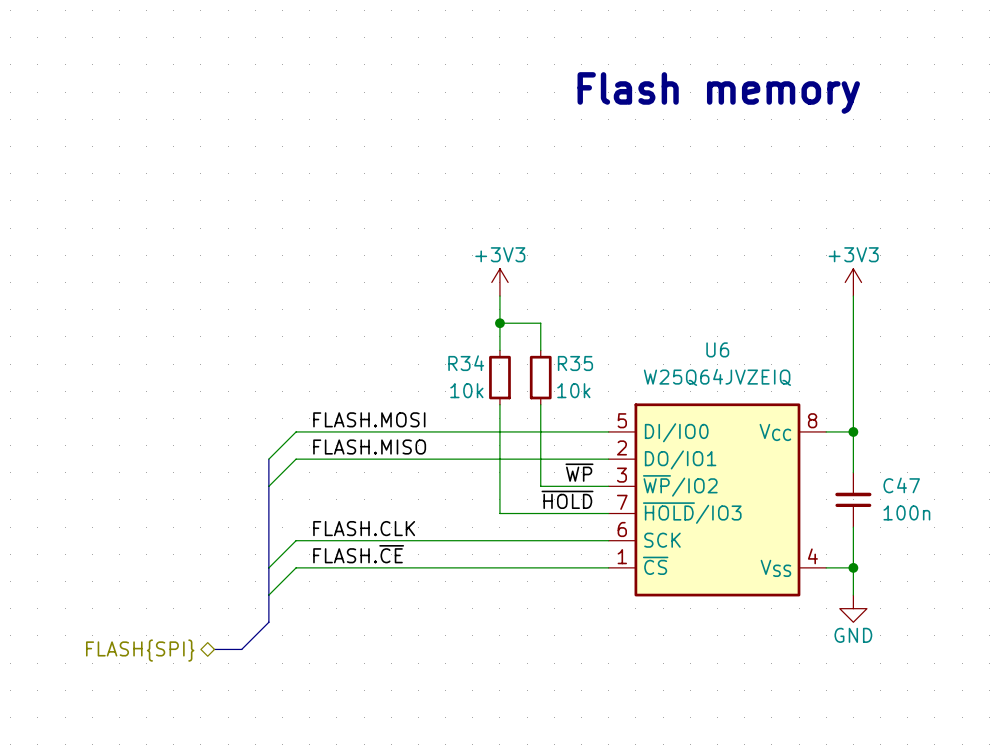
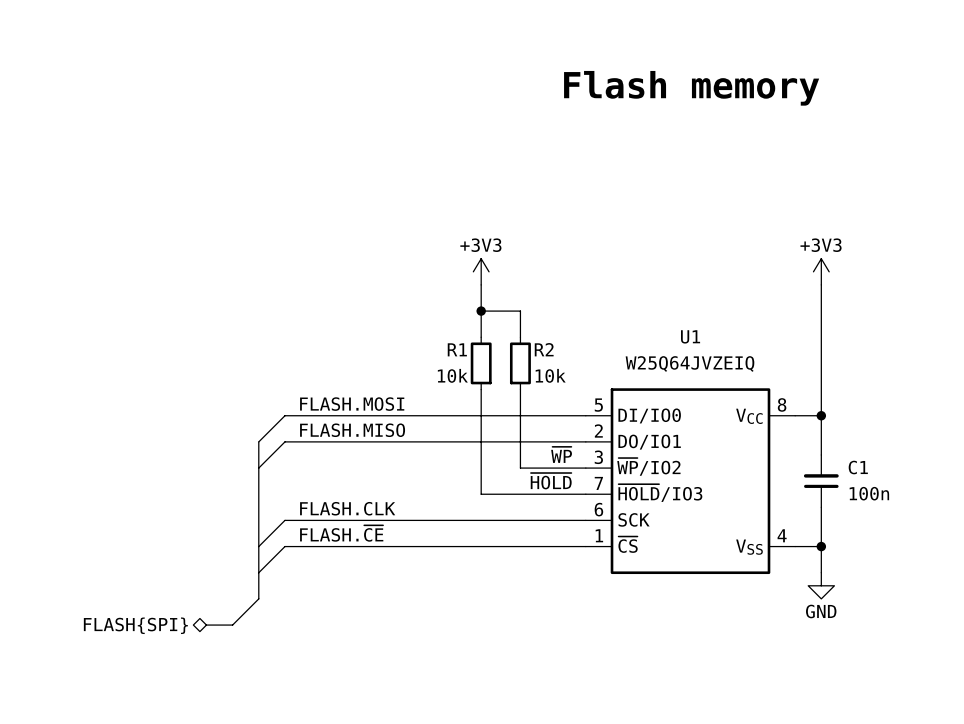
U6 name: U6 (717, 349) -> U1 (690, 336)
R34 name: R34 (466, 363) -> R1 (457, 349)
R35 name: R35 (575, 363) -> R2 (544, 349)
C47 name: C47 (901, 485) -> C1 (858, 467)

